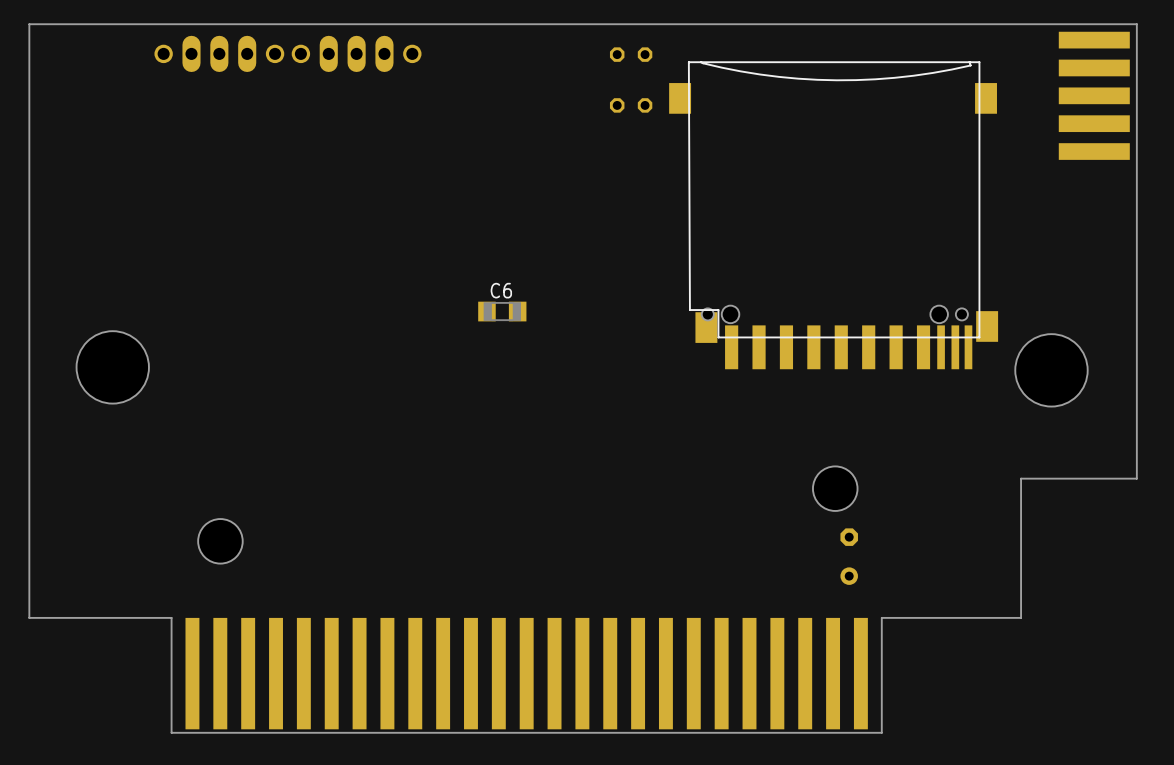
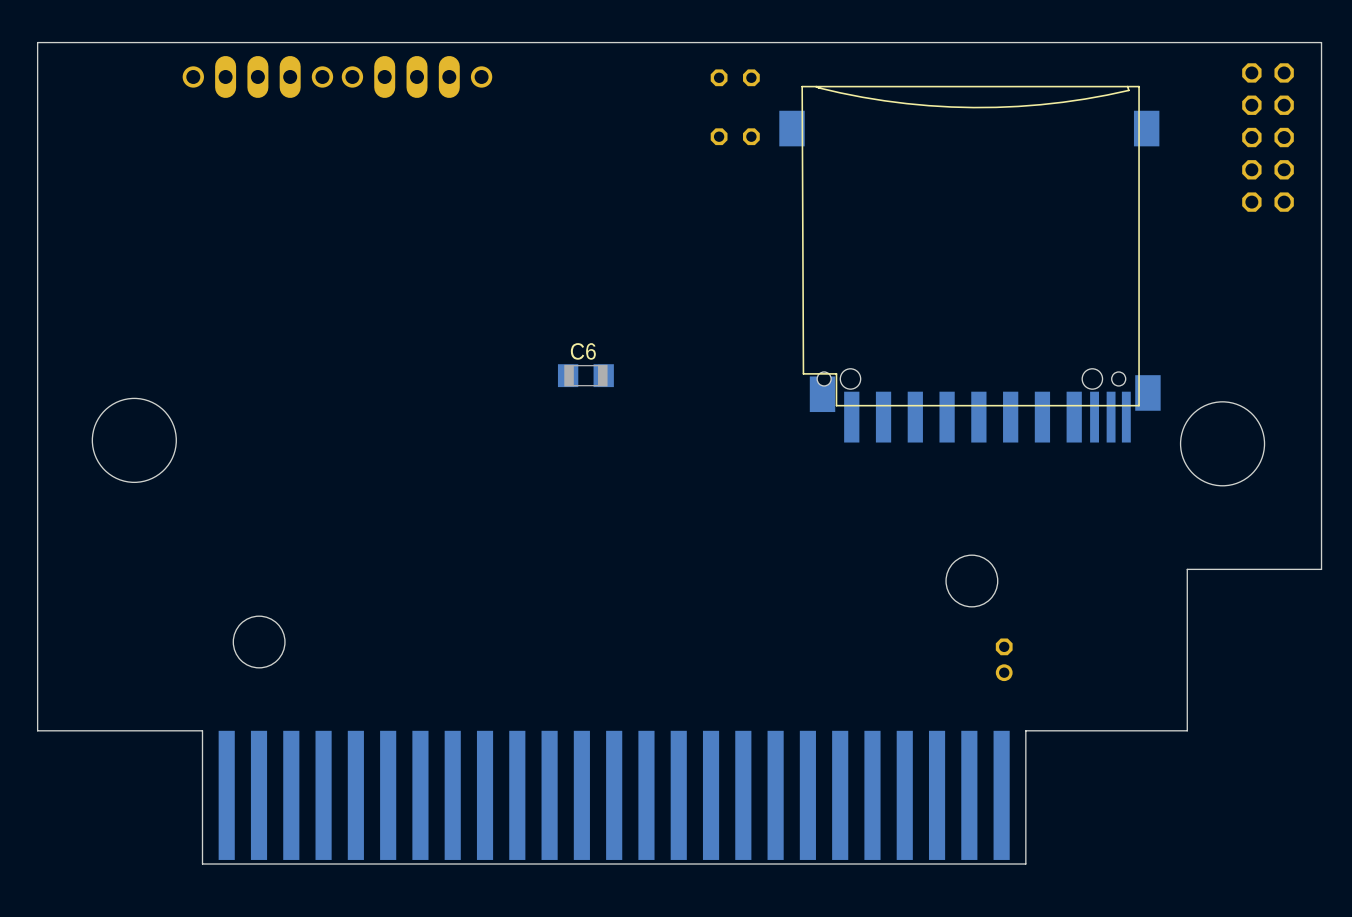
part footprint: [1058, 31, 1130, 160] -> [1242, 63, 1294, 212]
part: (849, 556) -> none
part: none -> (1004, 659)

